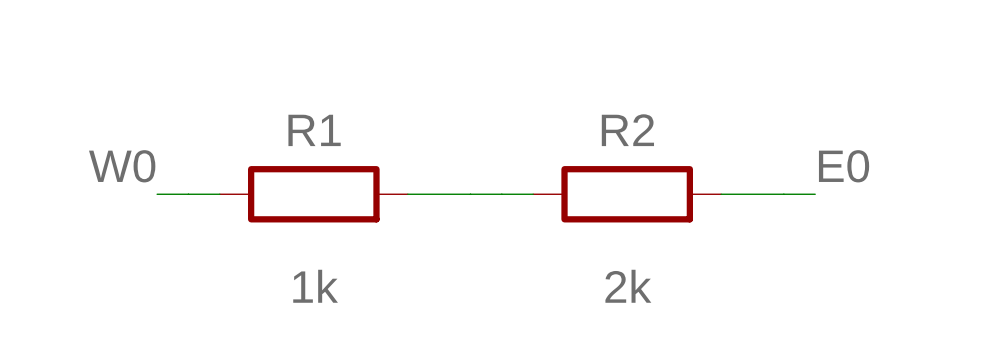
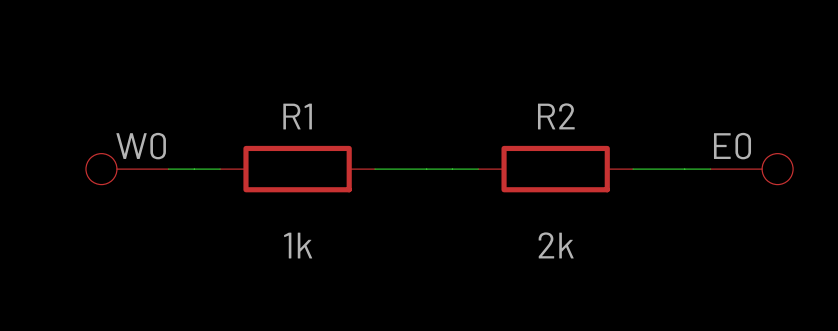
part: none -> (127, 169)
part: none -> (751, 169)

